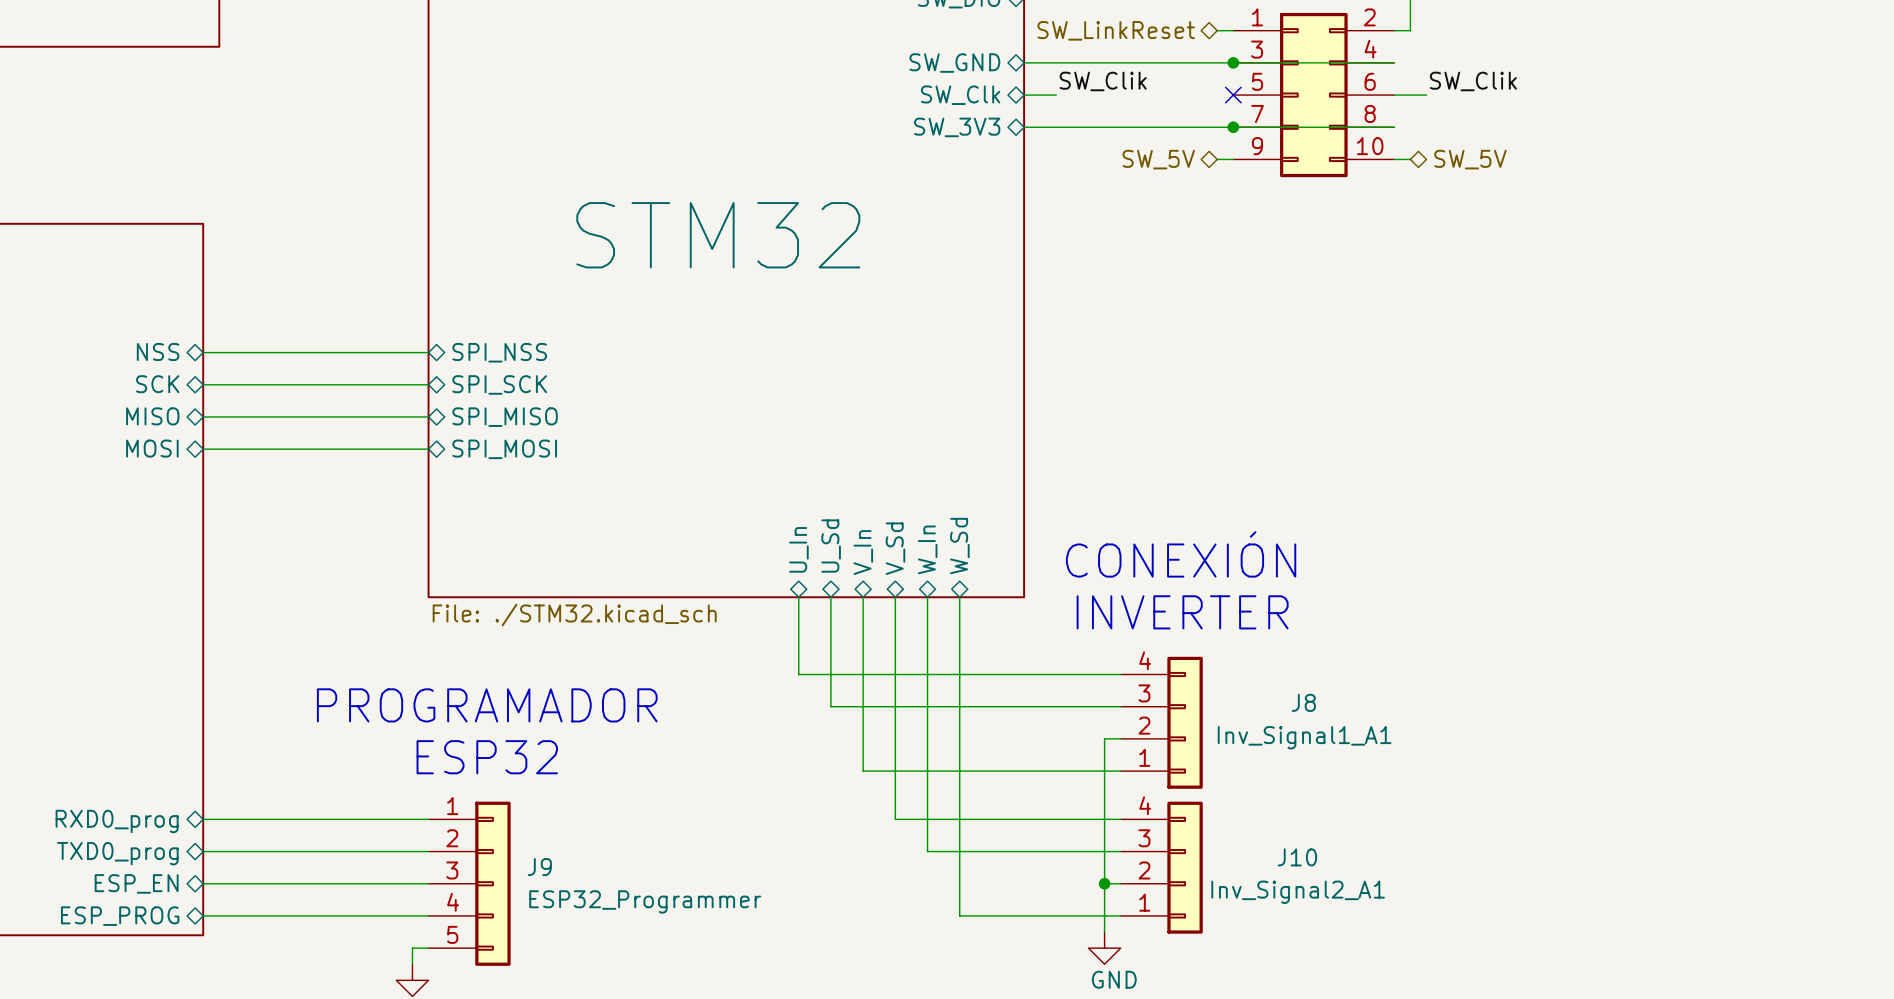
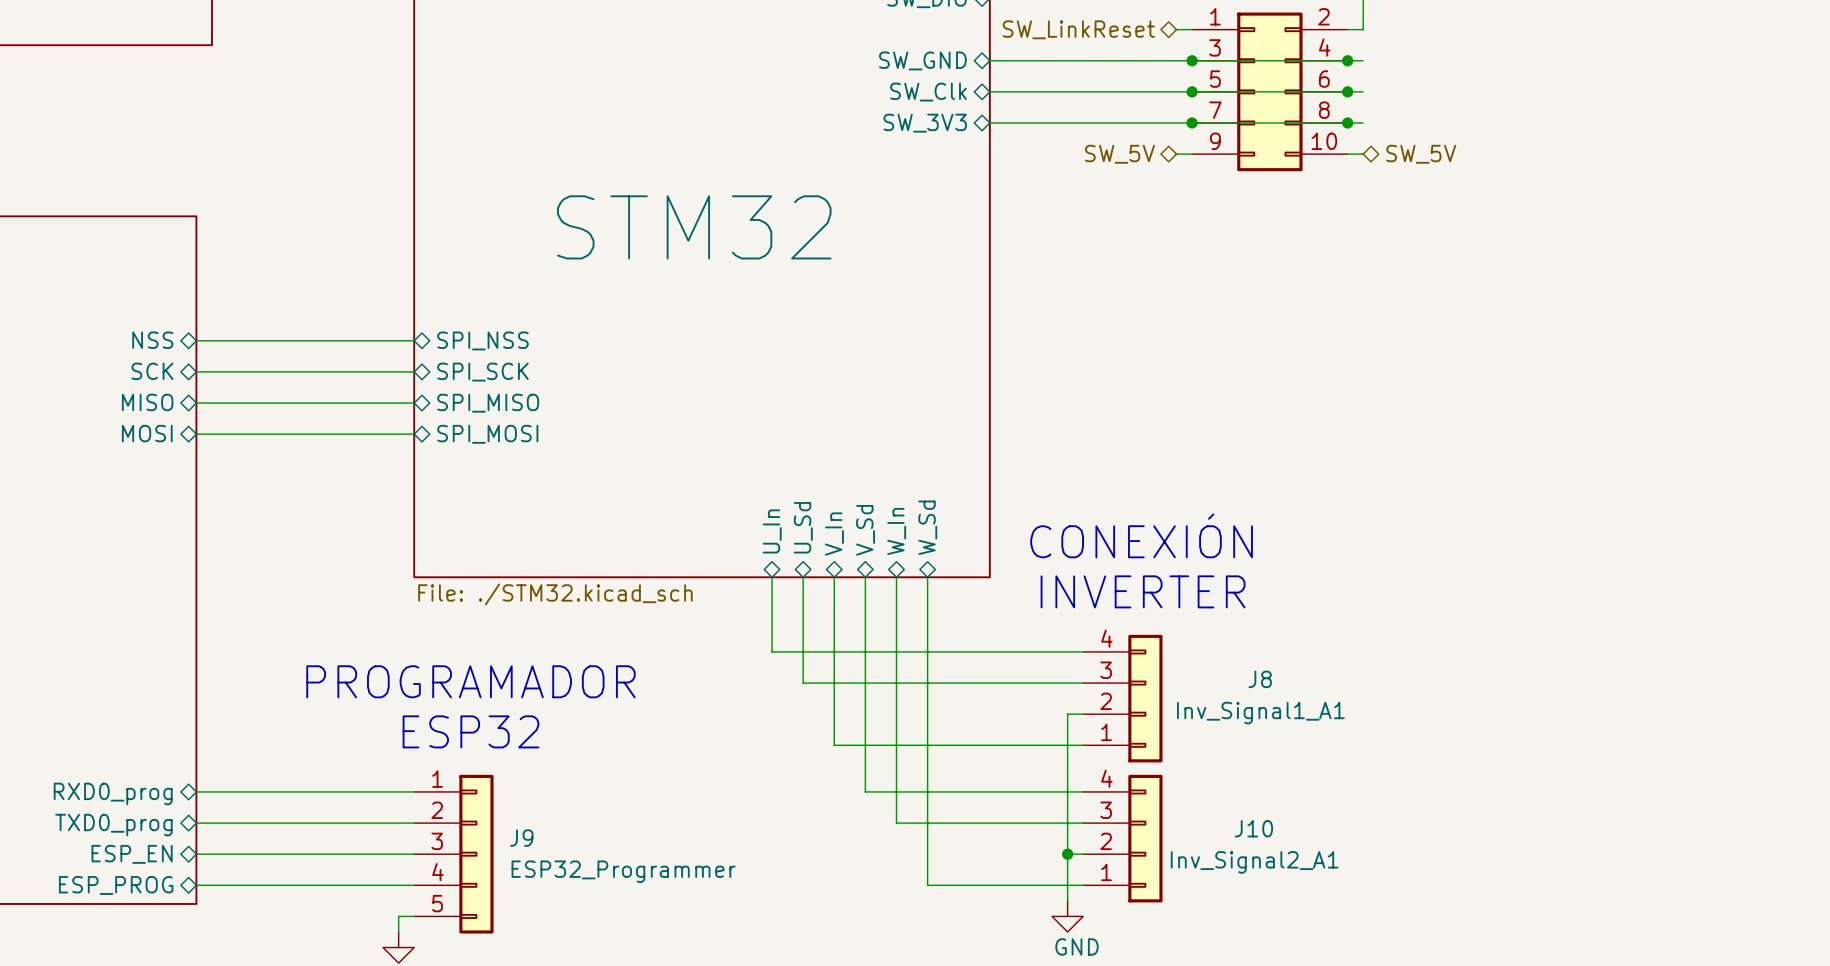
junction: none -> (1347, 60)
label: SW_Clik (1103, 81) -> none
label: SW_Clik (1473, 81) -> none
wire: none -> (1020, 91) (1347, 91)
no-connect mark: (1233, 95) -> none
junction: none -> (1192, 91)
junction: none -> (1347, 91)
wire: (1410, 95) (1426, 95) -> (1347, 60) (1363, 60)
wire: none -> (1347, 122) (1363, 122)
junction: none -> (1347, 122)

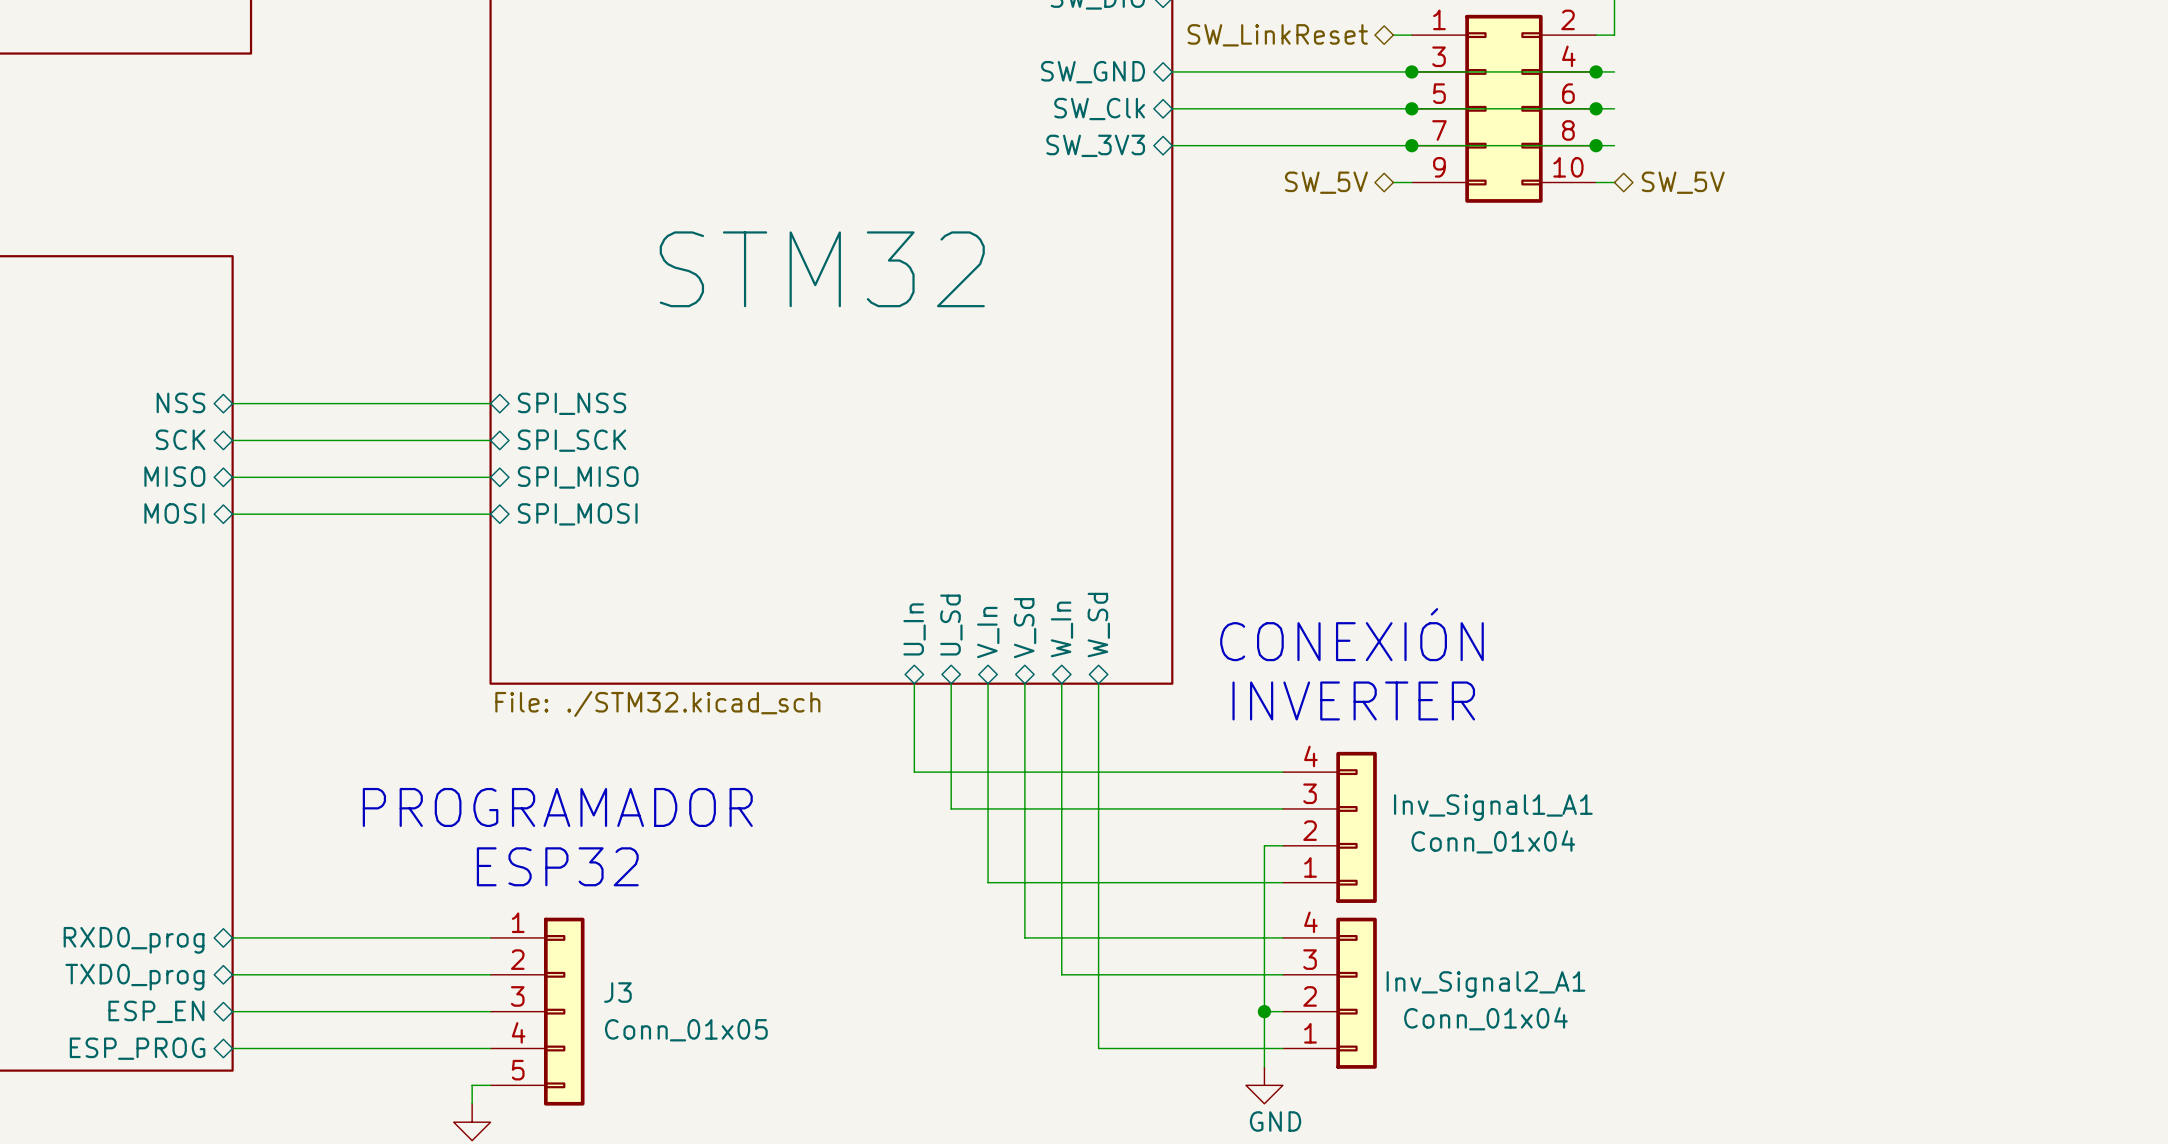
J8 name: J8 (1260, 679) -> Inv_Signal1_A1 (1493, 807)
J8 value: Inv_Signal1_A1 (1260, 713) -> Conn_01x04 (1493, 841)
J10 name: J10 (1253, 828) -> Inv_Signal2_A1 (1485, 984)
J9 name: J9 (521, 838) -> J3 (617, 992)
J10 value: Inv_Signal2_A1 (1254, 862) -> Conn_01x04 (1485, 1018)
J9 value: ESP32_Programmer (623, 871) -> Conn_01x05 (686, 1030)

